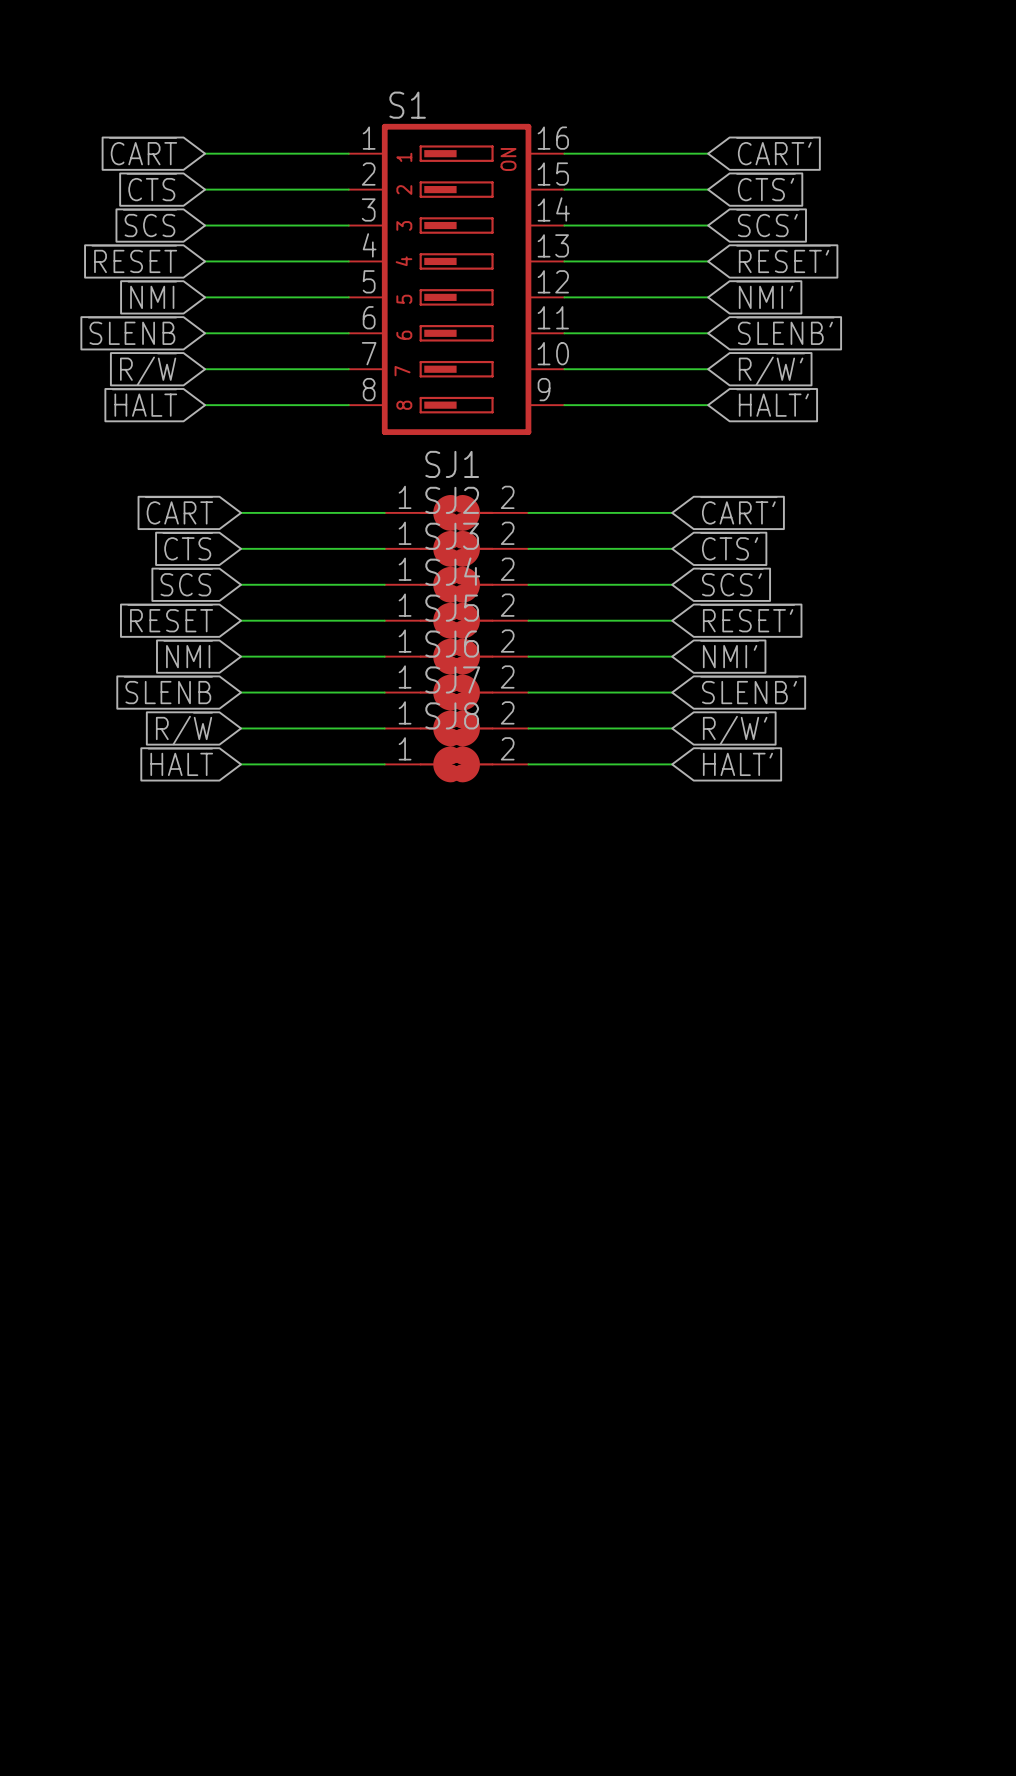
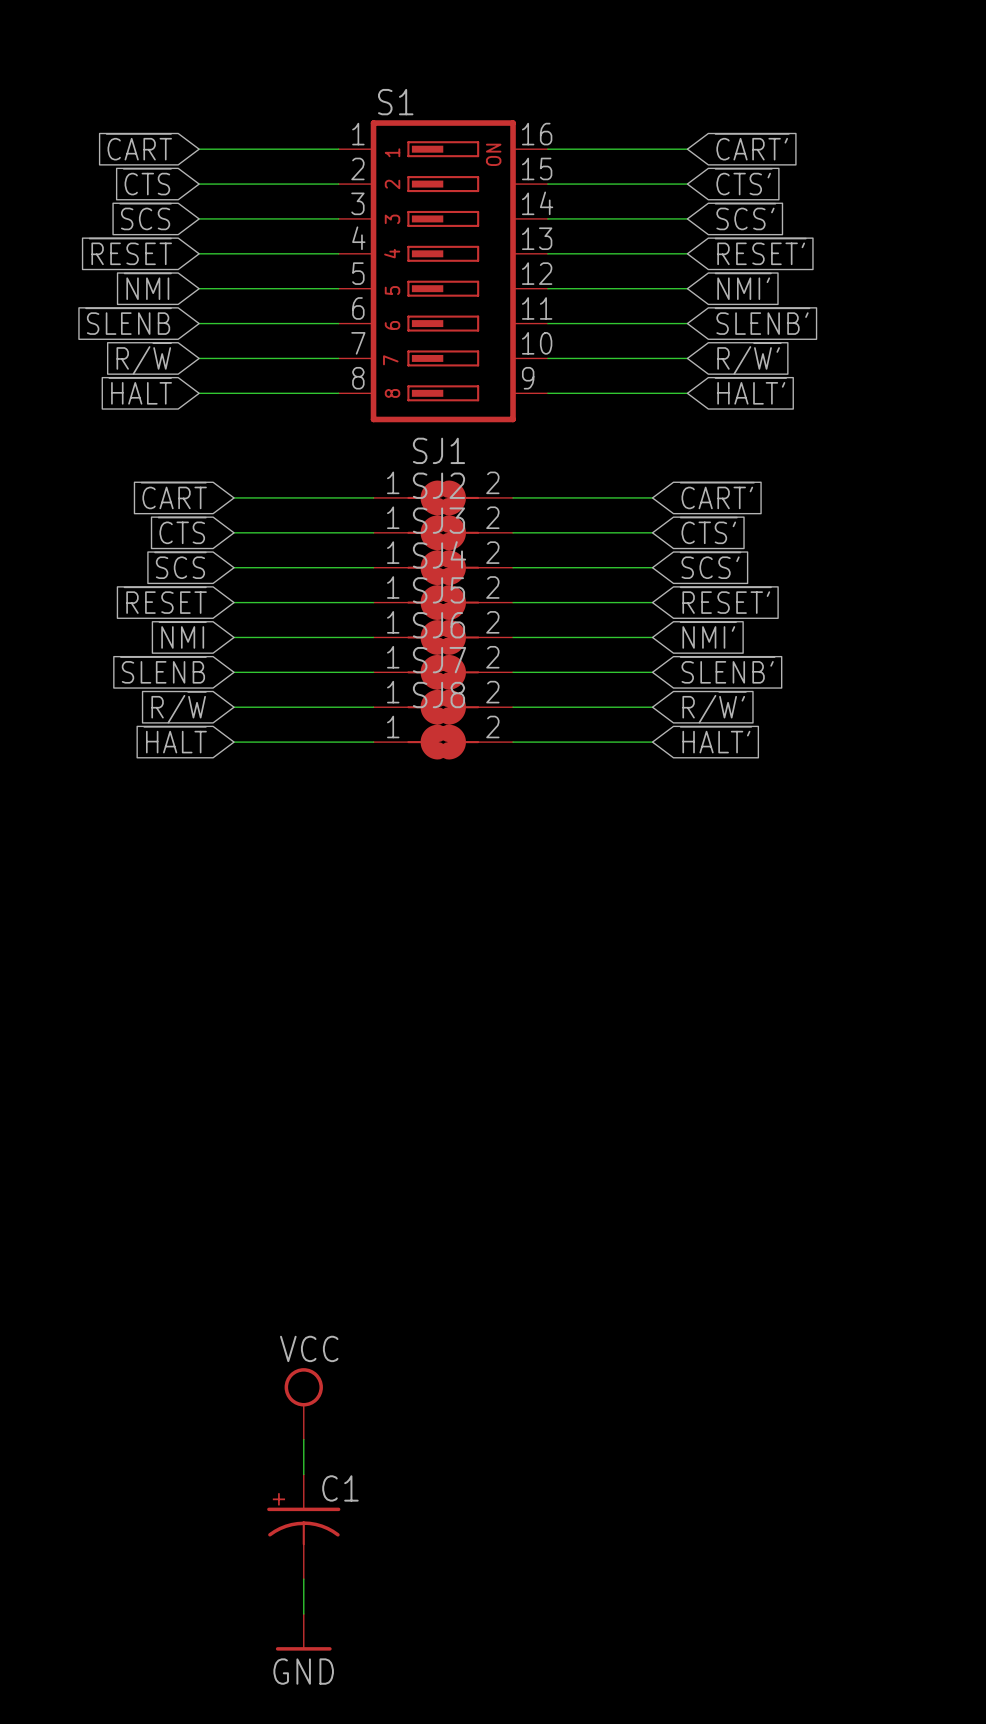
power symbol: none -> VCC (303, 1403)
wire: none -> (303, 1439) (303, 1474)
C1: none -> (303, 1526)
wire: none -> (303, 1579) (303, 1614)
power symbol: none -> GND (303, 1632)

